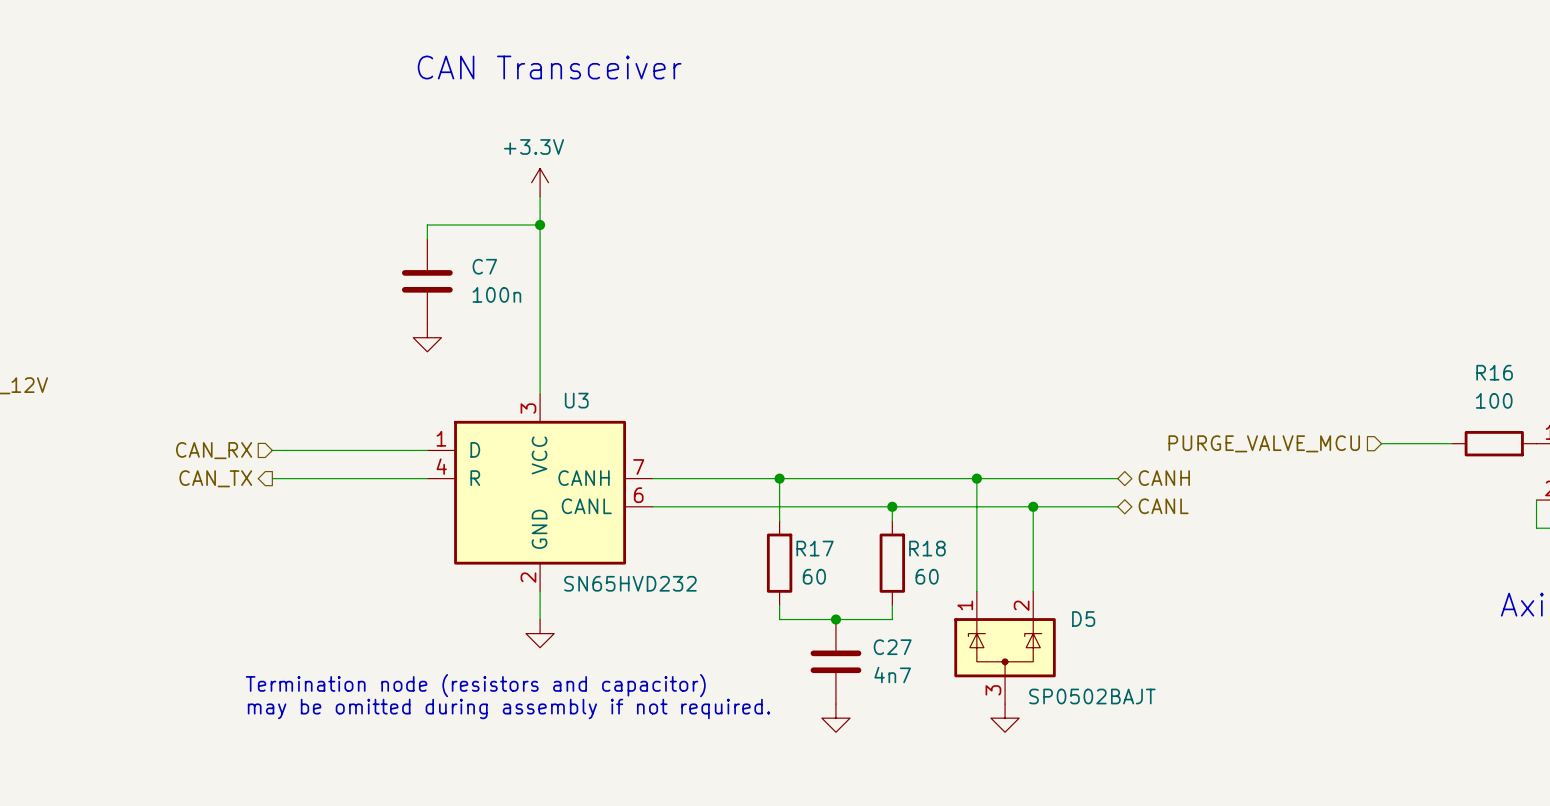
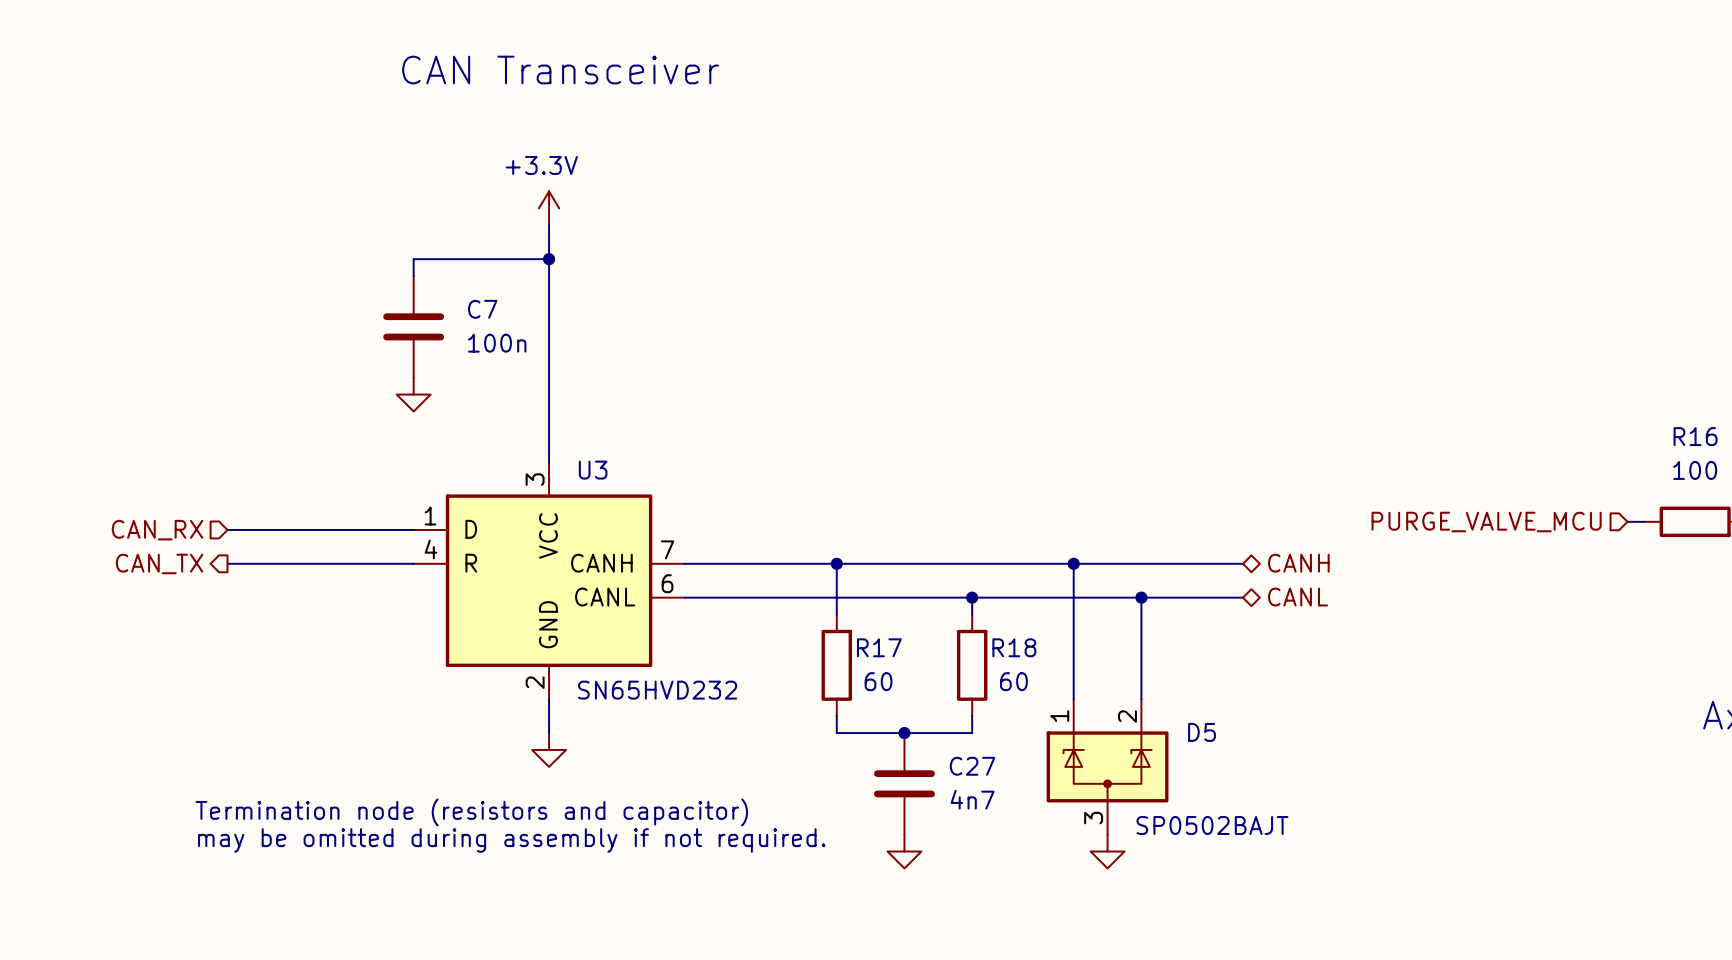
hierarchical label position: PURGE_VALVE_MCU (1264, 443) -> PURGE_VALVE_MCU (1486, 522)
wire: (1381, 443) (1437, 443) -> none

